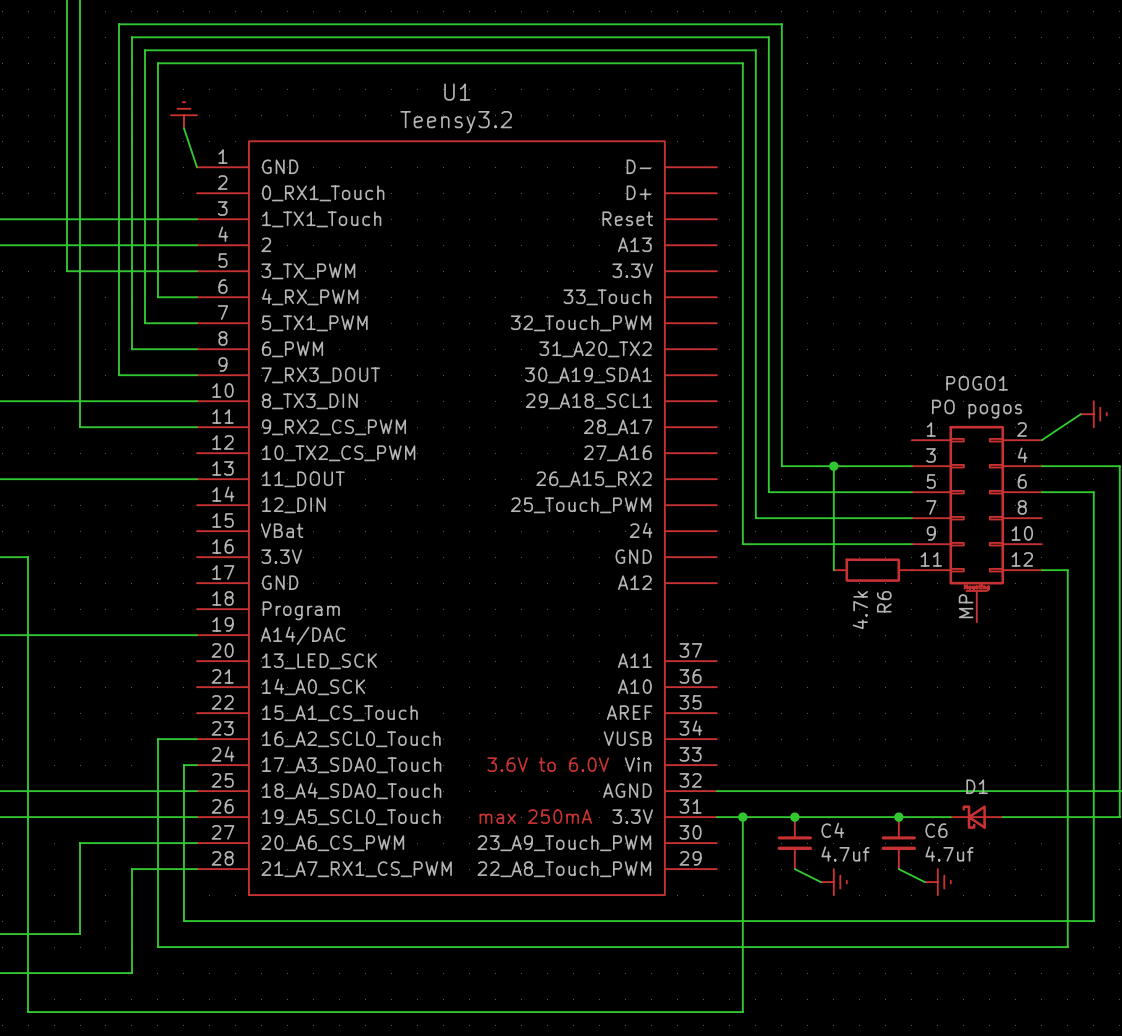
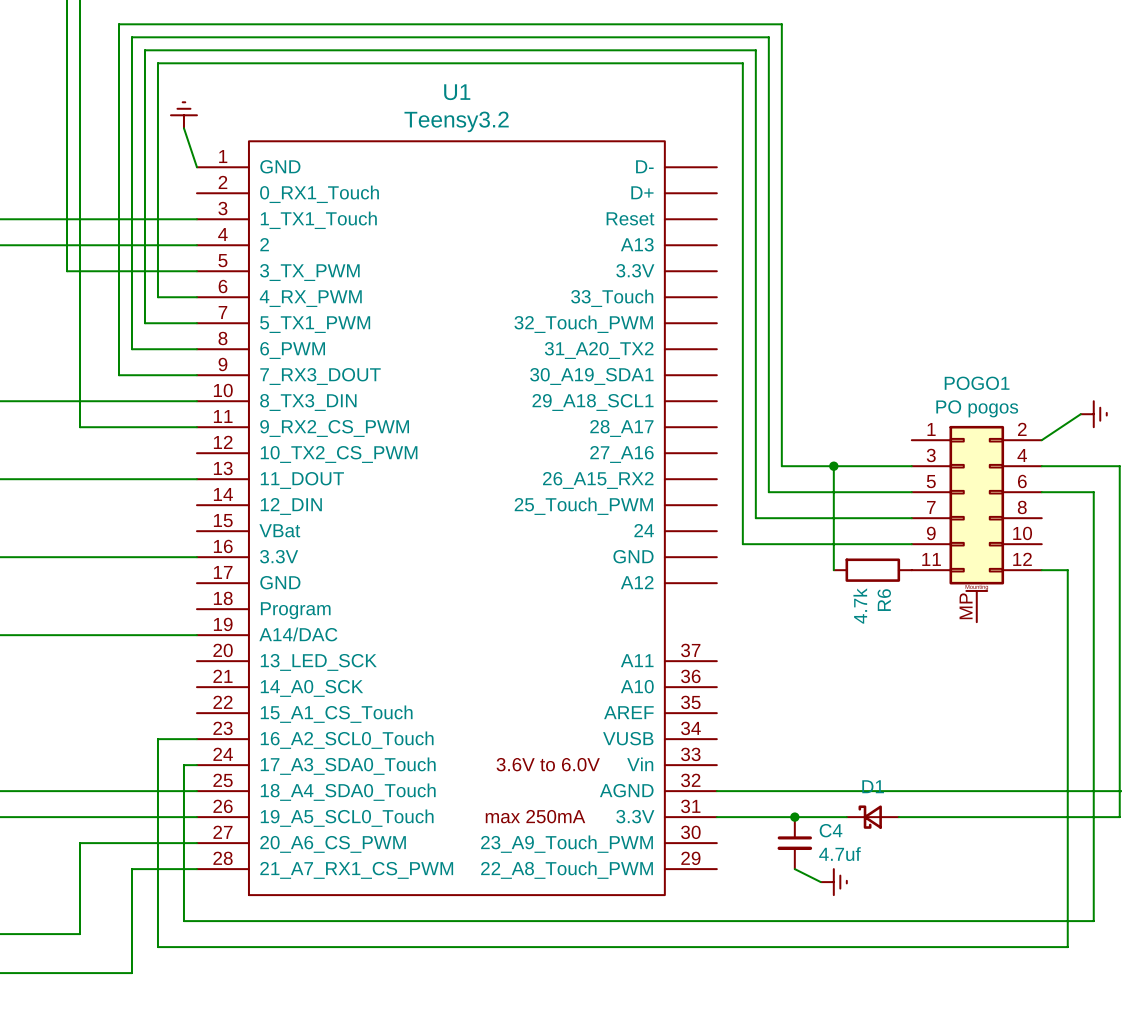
wire: (28, 557) (28, 1012) (742, 1012) (742, 817) -> (28, 557) (196, 557)
junction: (742, 817) -> none
junction: (898, 817) -> none
D1 position: (976, 817) -> (872, 817)
C6: 4.7uf (898, 843) -> none
wire: (898, 869) (924, 882) -> none
power symbol: (937, 882) -> none

